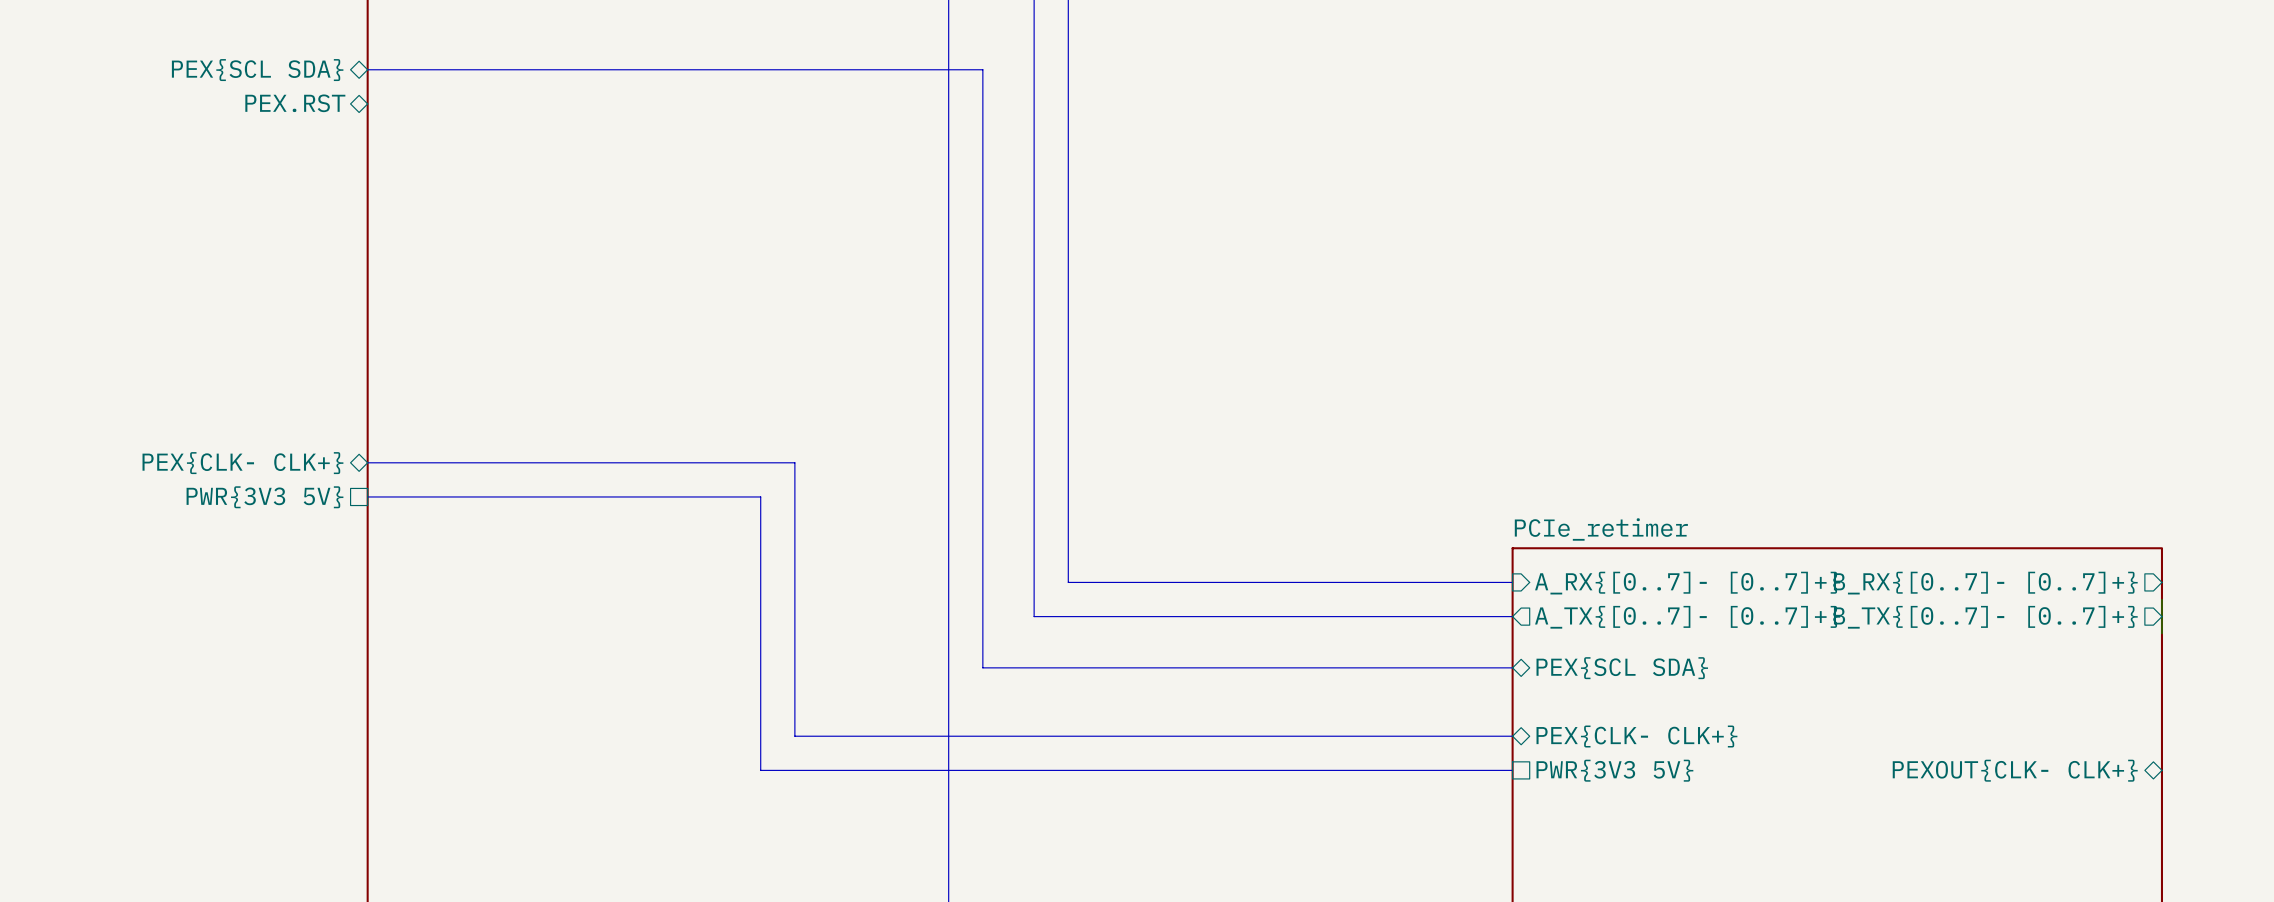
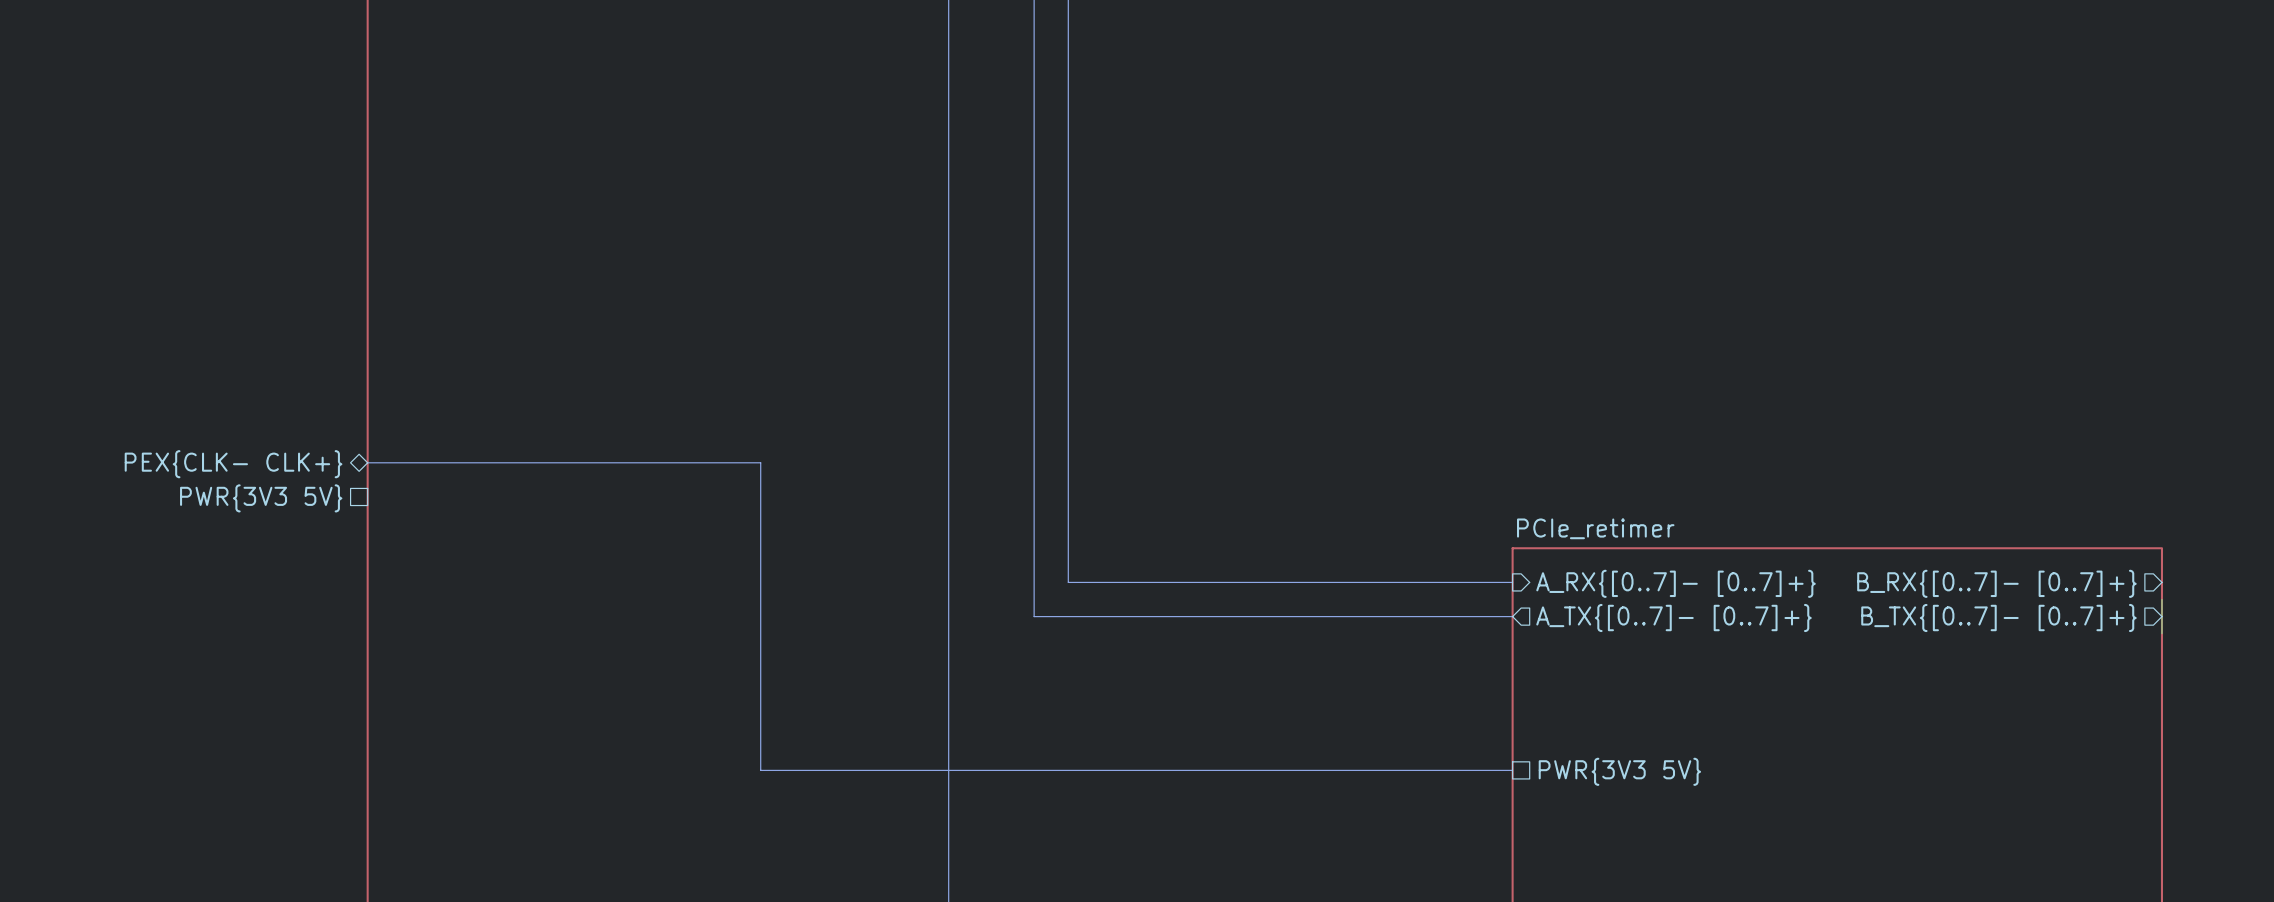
bus: (367, 69) (982, 69) (982, 667) (1512, 667) -> none
sheet pin: PEX{SCL SDA} (257, 70) -> none
sheet pin: PEX.RST (295, 103) -> none
bus: (760, 462) (794, 462) (794, 736) (1512, 736) -> none
bus: (367, 496) (760, 496) -> (760, 462) (760, 496)
sheet pin: PEX{SCL SDA} (1622, 668) -> none
sheet pin: PEX{CLK- CLK+} (1636, 736) -> none
sheet pin: PEXOUT{CLK- CLK+} (2015, 770) -> none

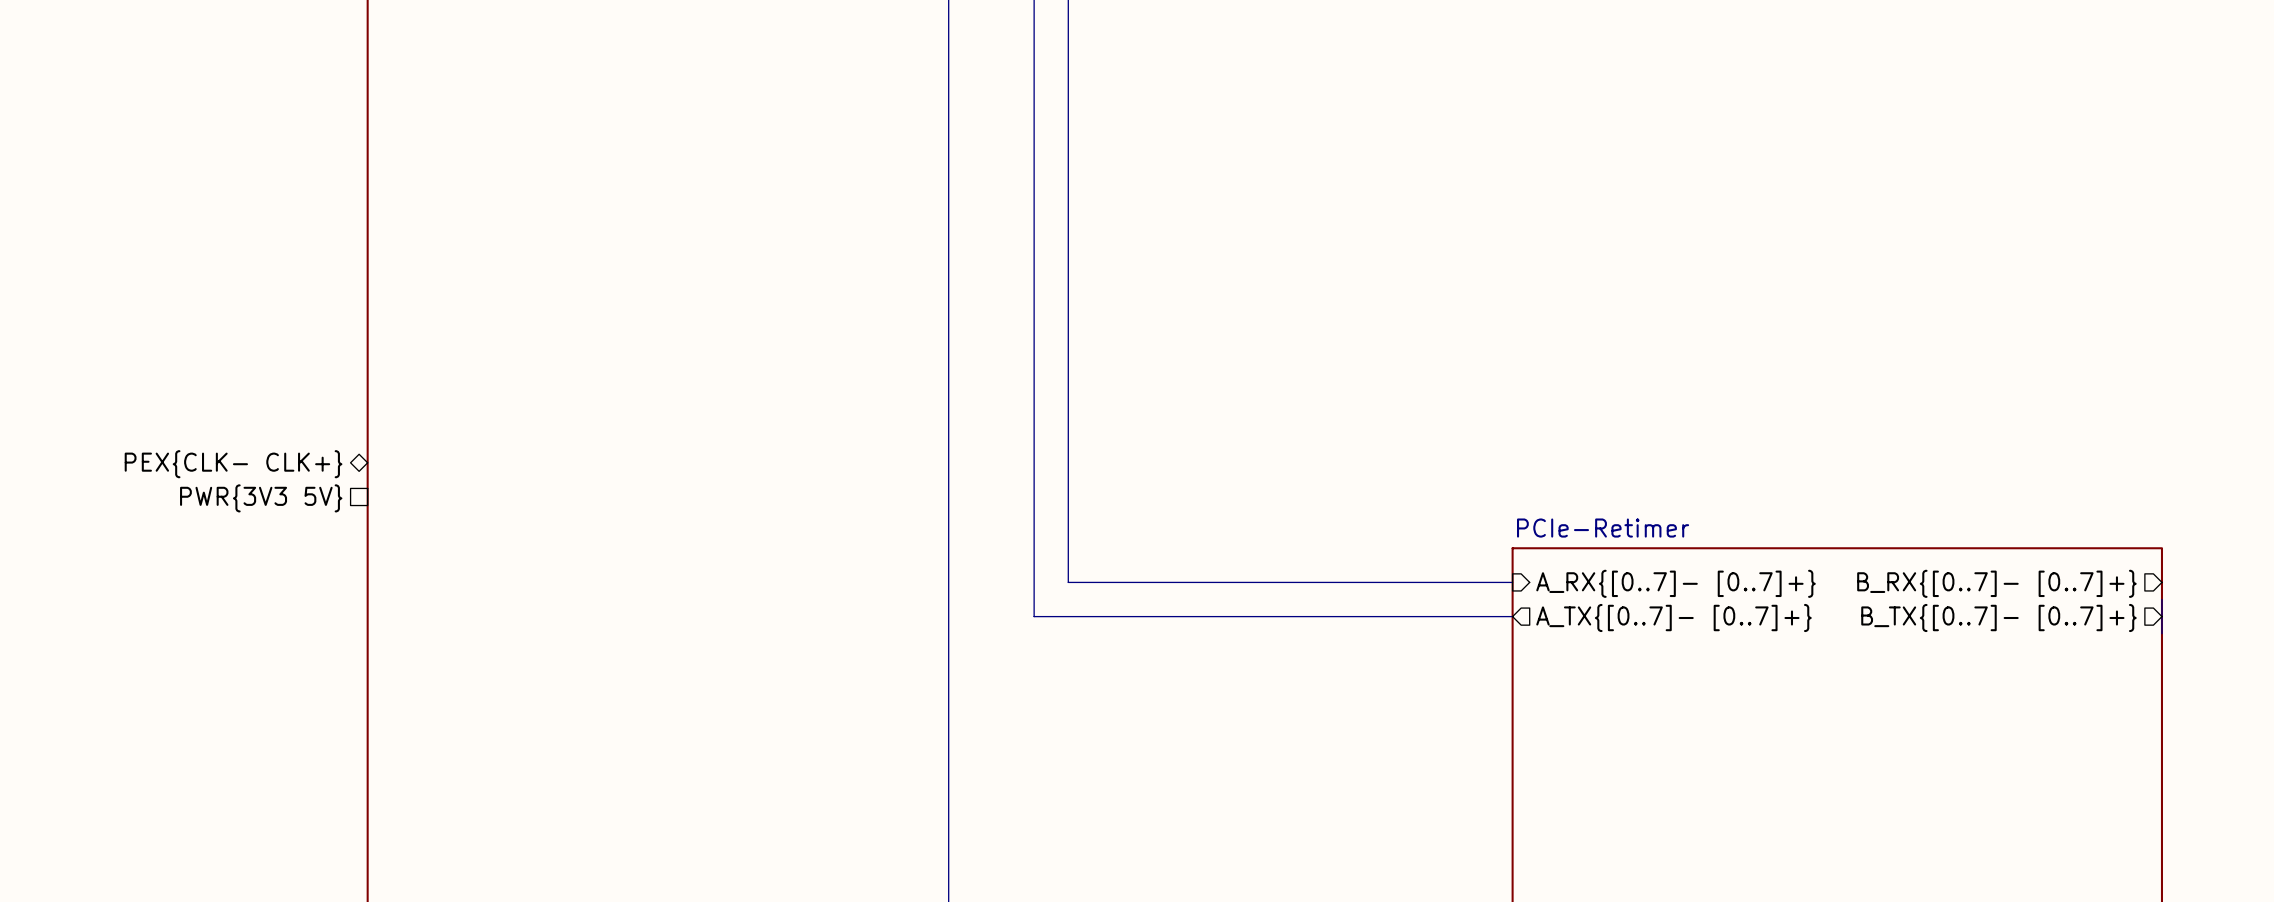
bus: (367, 462) (760, 462) (760, 770) (1512, 770) -> none
sheet PCIe_retimer name: PCIe_retimer (1595, 528) -> PCIe-Retimer (1603, 528)
sheet pin: PWR{3V3 5V} (1619, 771) -> none

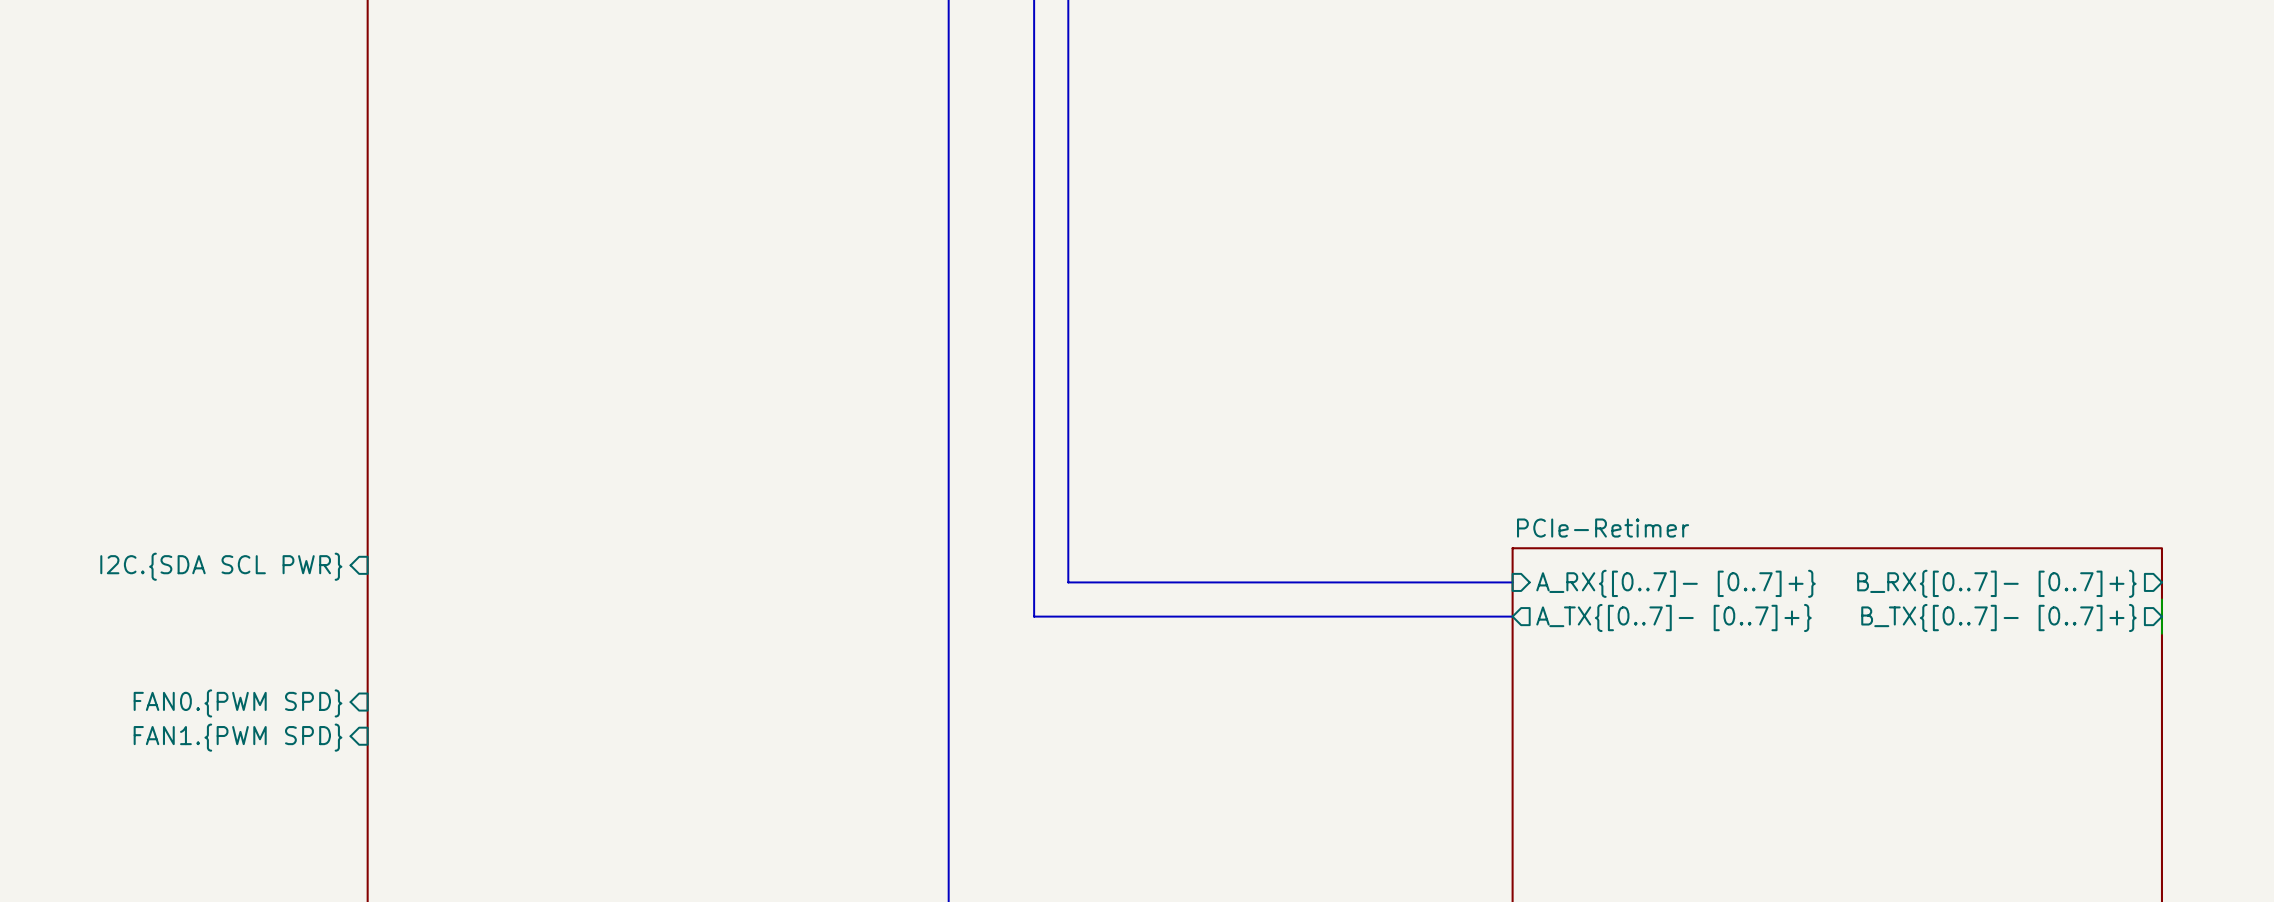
sheet pin: PEX{CLK- CLK+} (233, 464) -> none
sheet pin: PWR{3V3 5V} (261, 498) -> none
sheet pin: none -> I2C.{SDA SCL PWR} (221, 566)
sheet pin: none -> FAN0.{PWM SPD} (238, 703)
sheet pin: none -> FAN1.{PWM SPD} (238, 737)

